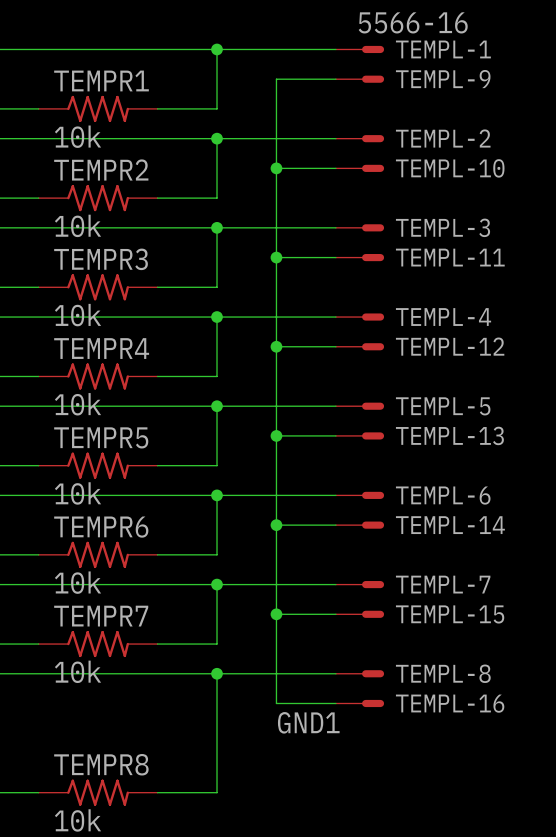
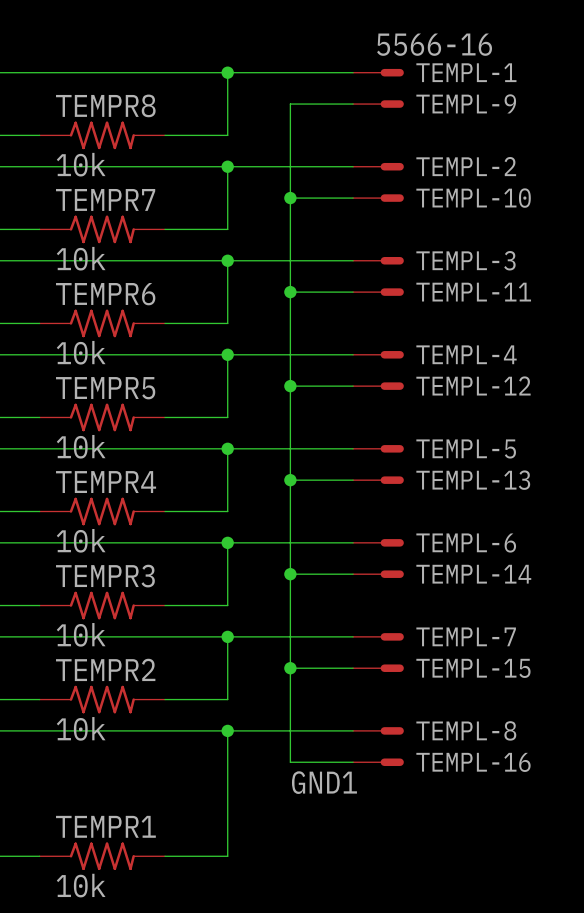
TEMPR1 name: TEMPR1 (101, 80) -> TEMPR8 (105, 105)
TEMPR2 name: TEMPR2 (101, 169) -> TEMPR7 (105, 199)
TEMPR3 name: TEMPR3 (101, 259) -> TEMPR6 (105, 294)
TEMPR4 name: TEMPR4 (101, 348) -> TEMPR5 (105, 388)
TEMPR5 name: TEMPR5 (101, 437) -> TEMPR4 (106, 482)
TEMPR6 name: TEMPR6 (101, 527) -> TEMPR3 (105, 576)
TEMPR7 name: TEMPR7 (101, 616) -> TEMPR2 (105, 669)
TEMPR8 name: TEMPR8 (101, 764) -> TEMPR1 (105, 826)

